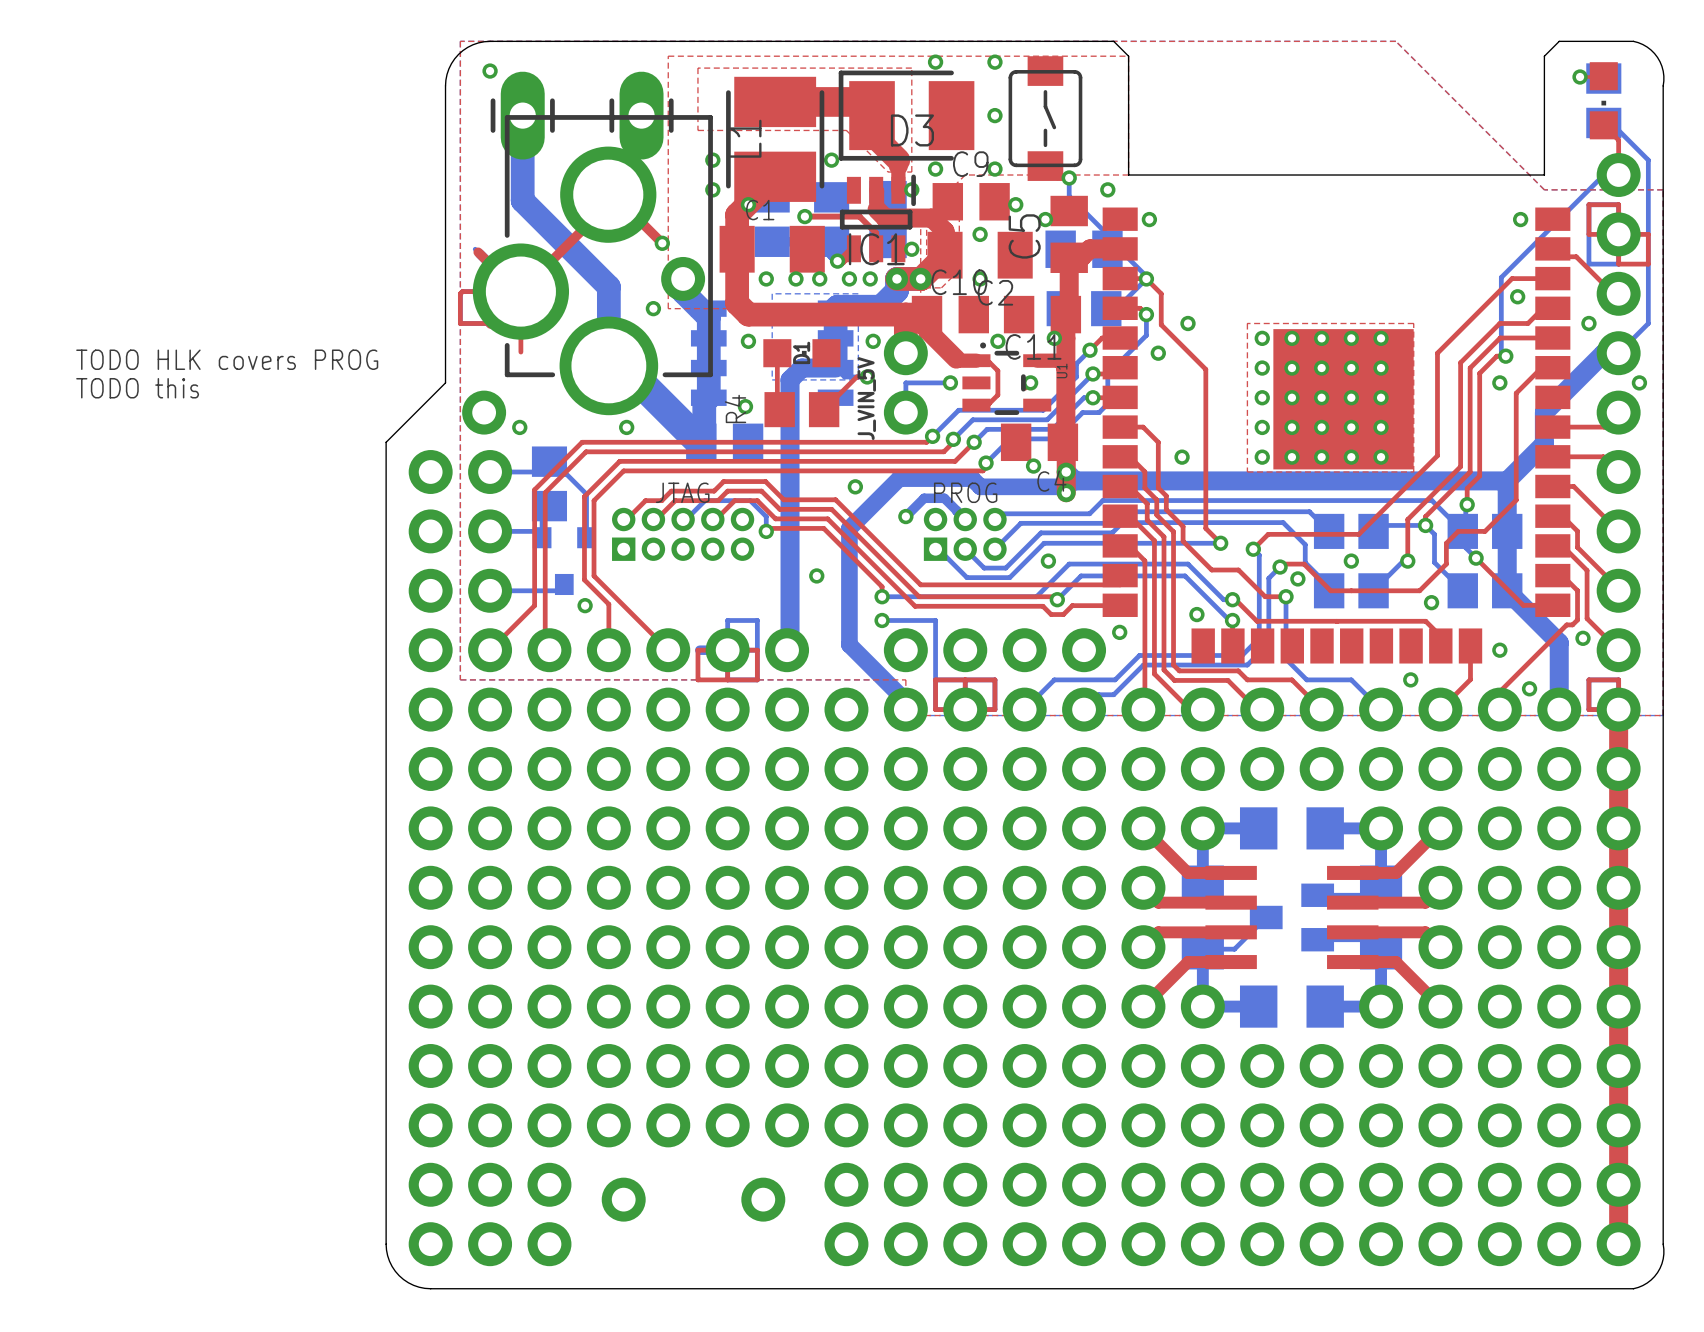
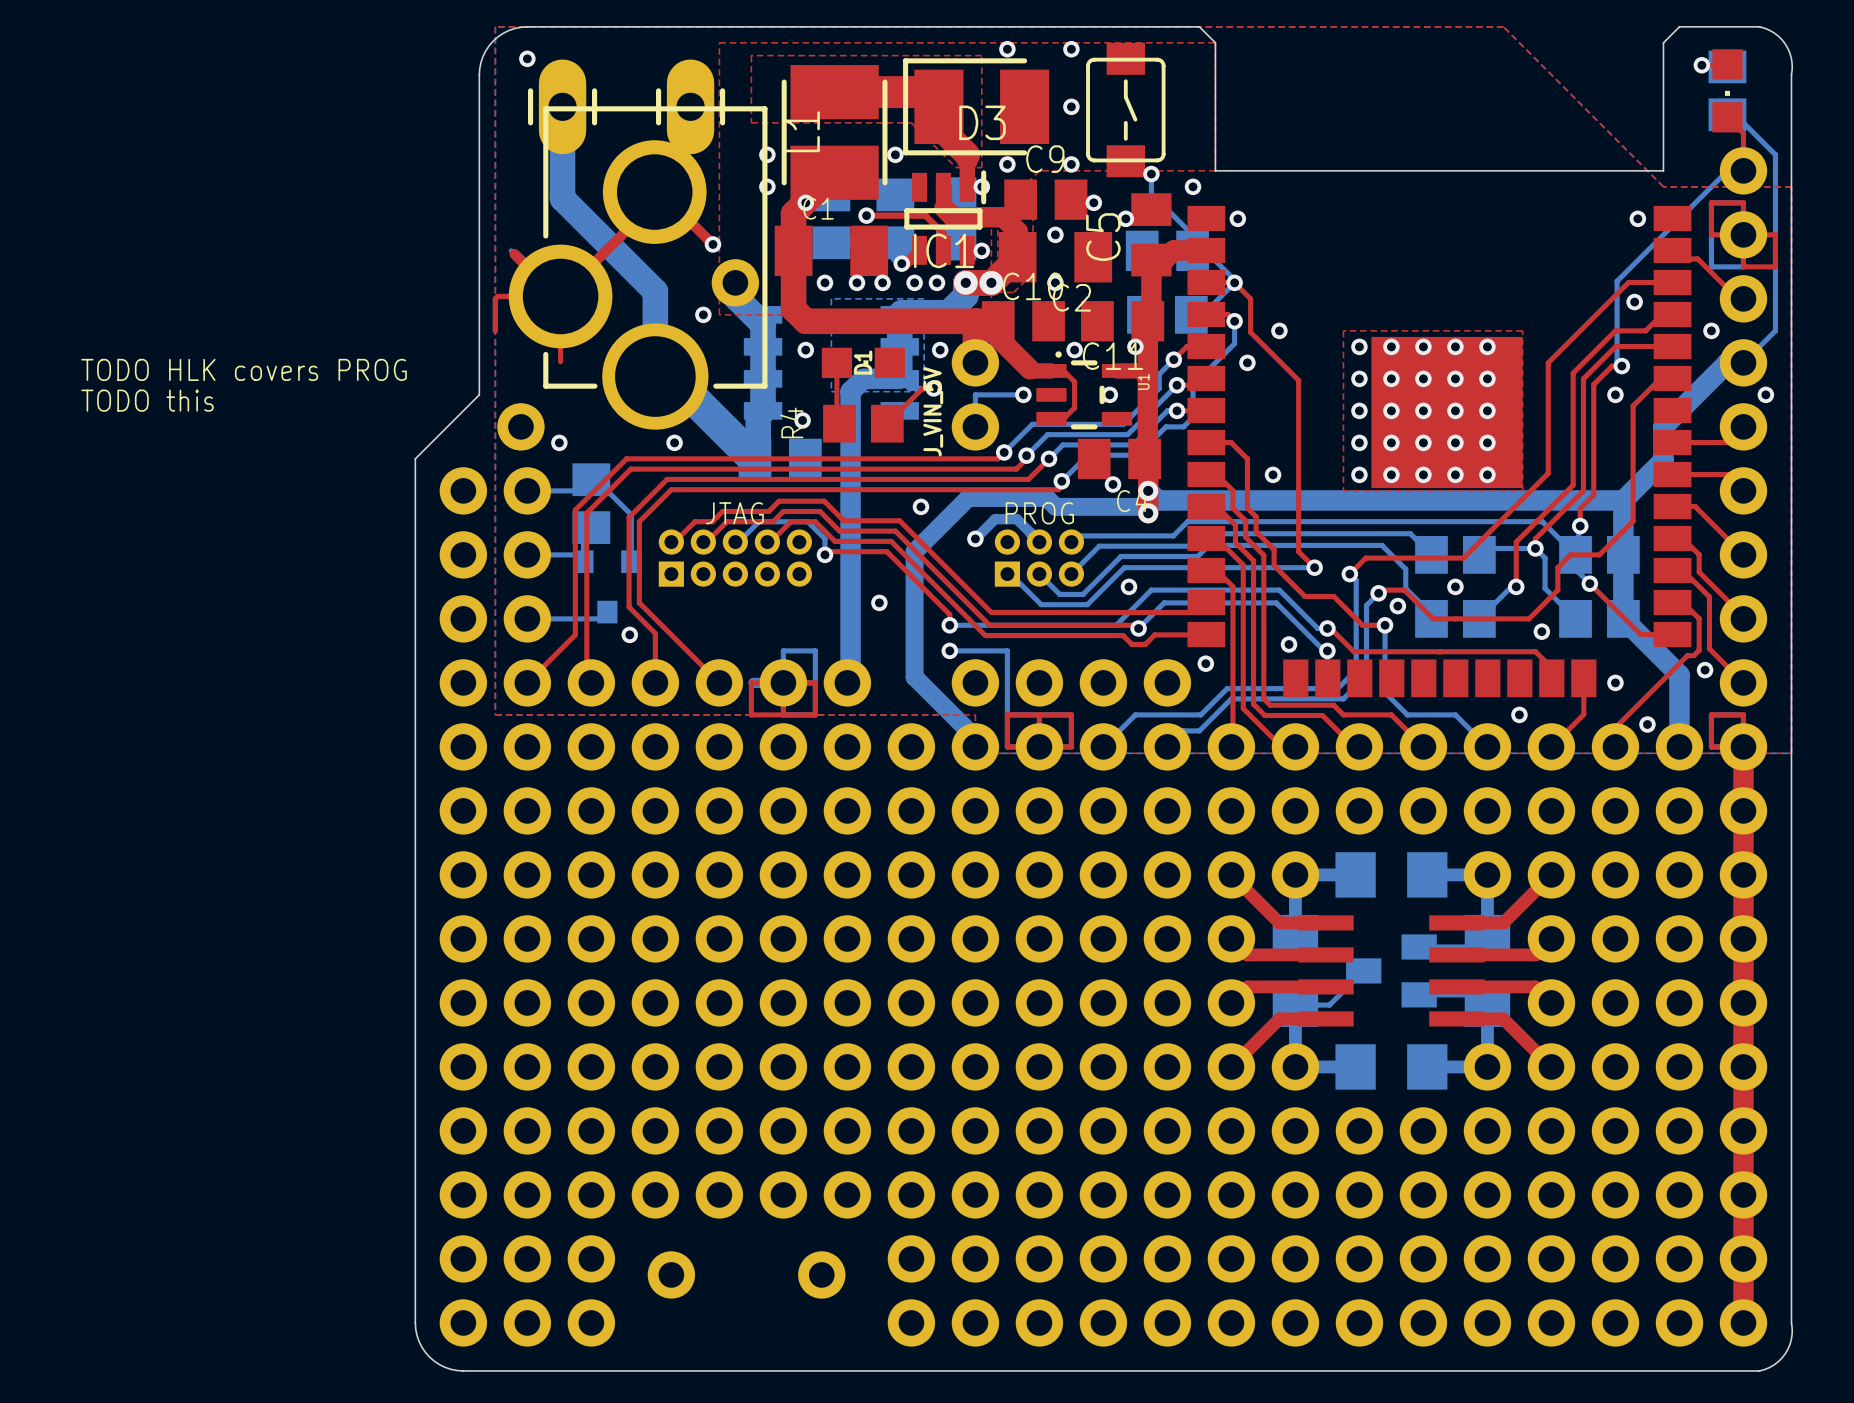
top track: (460, 323) (490, 323) -> none

